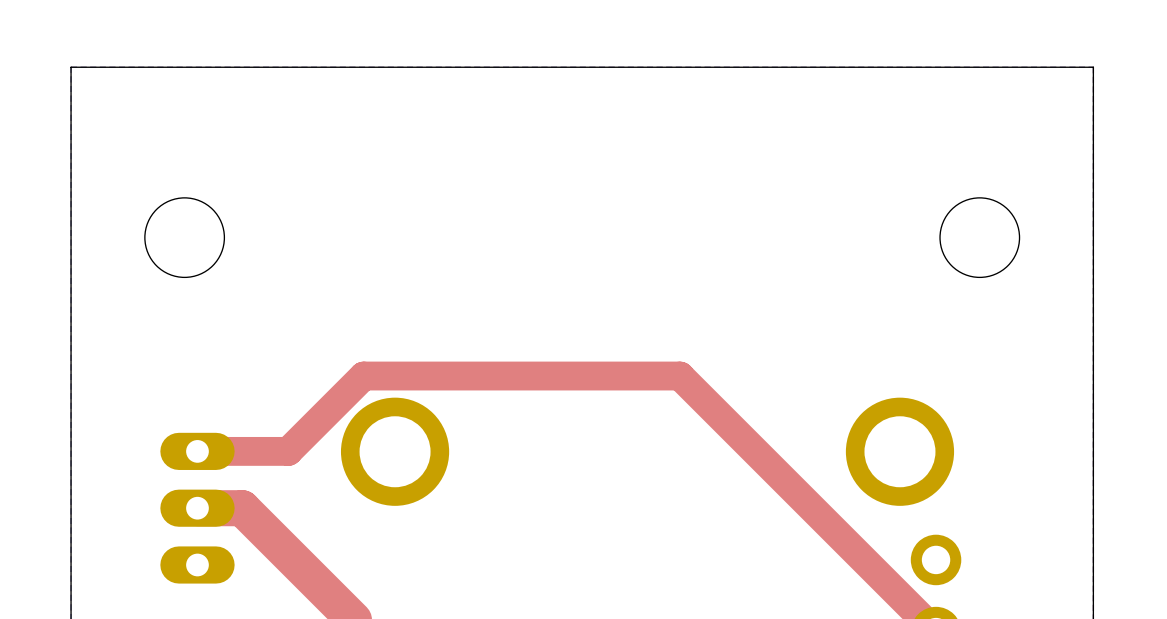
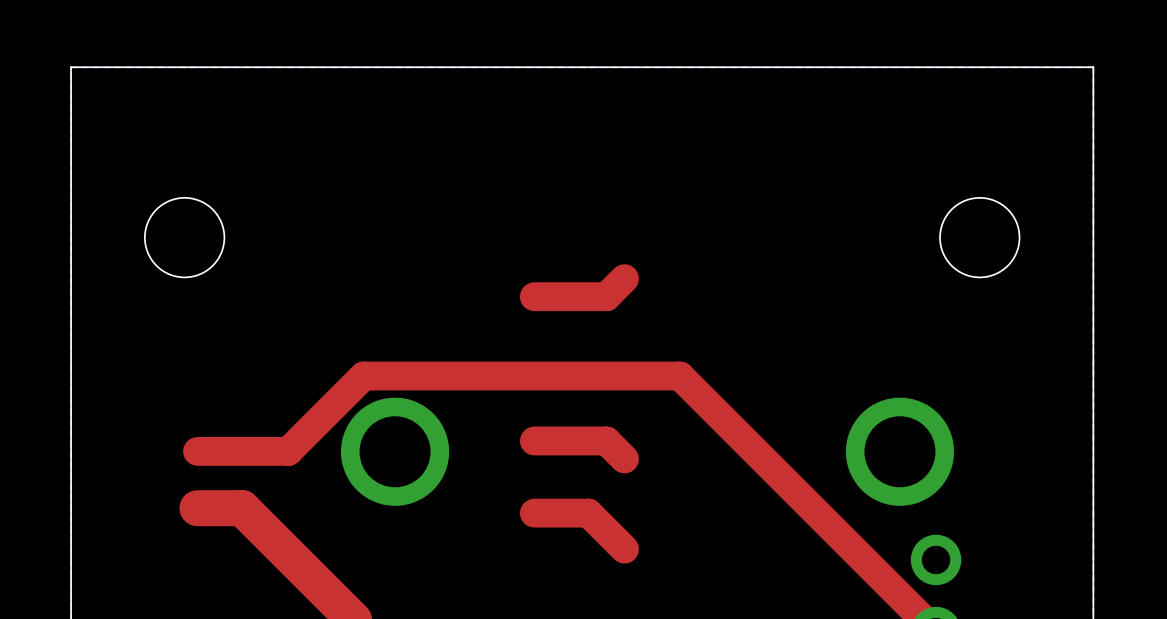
top track: none -> (624, 278) (606, 296) (534, 296)
top track: none -> (534, 440) (606, 440) (624, 459)
part: (197, 508) -> none
top track: none -> (534, 513) (588, 513) (624, 549)

